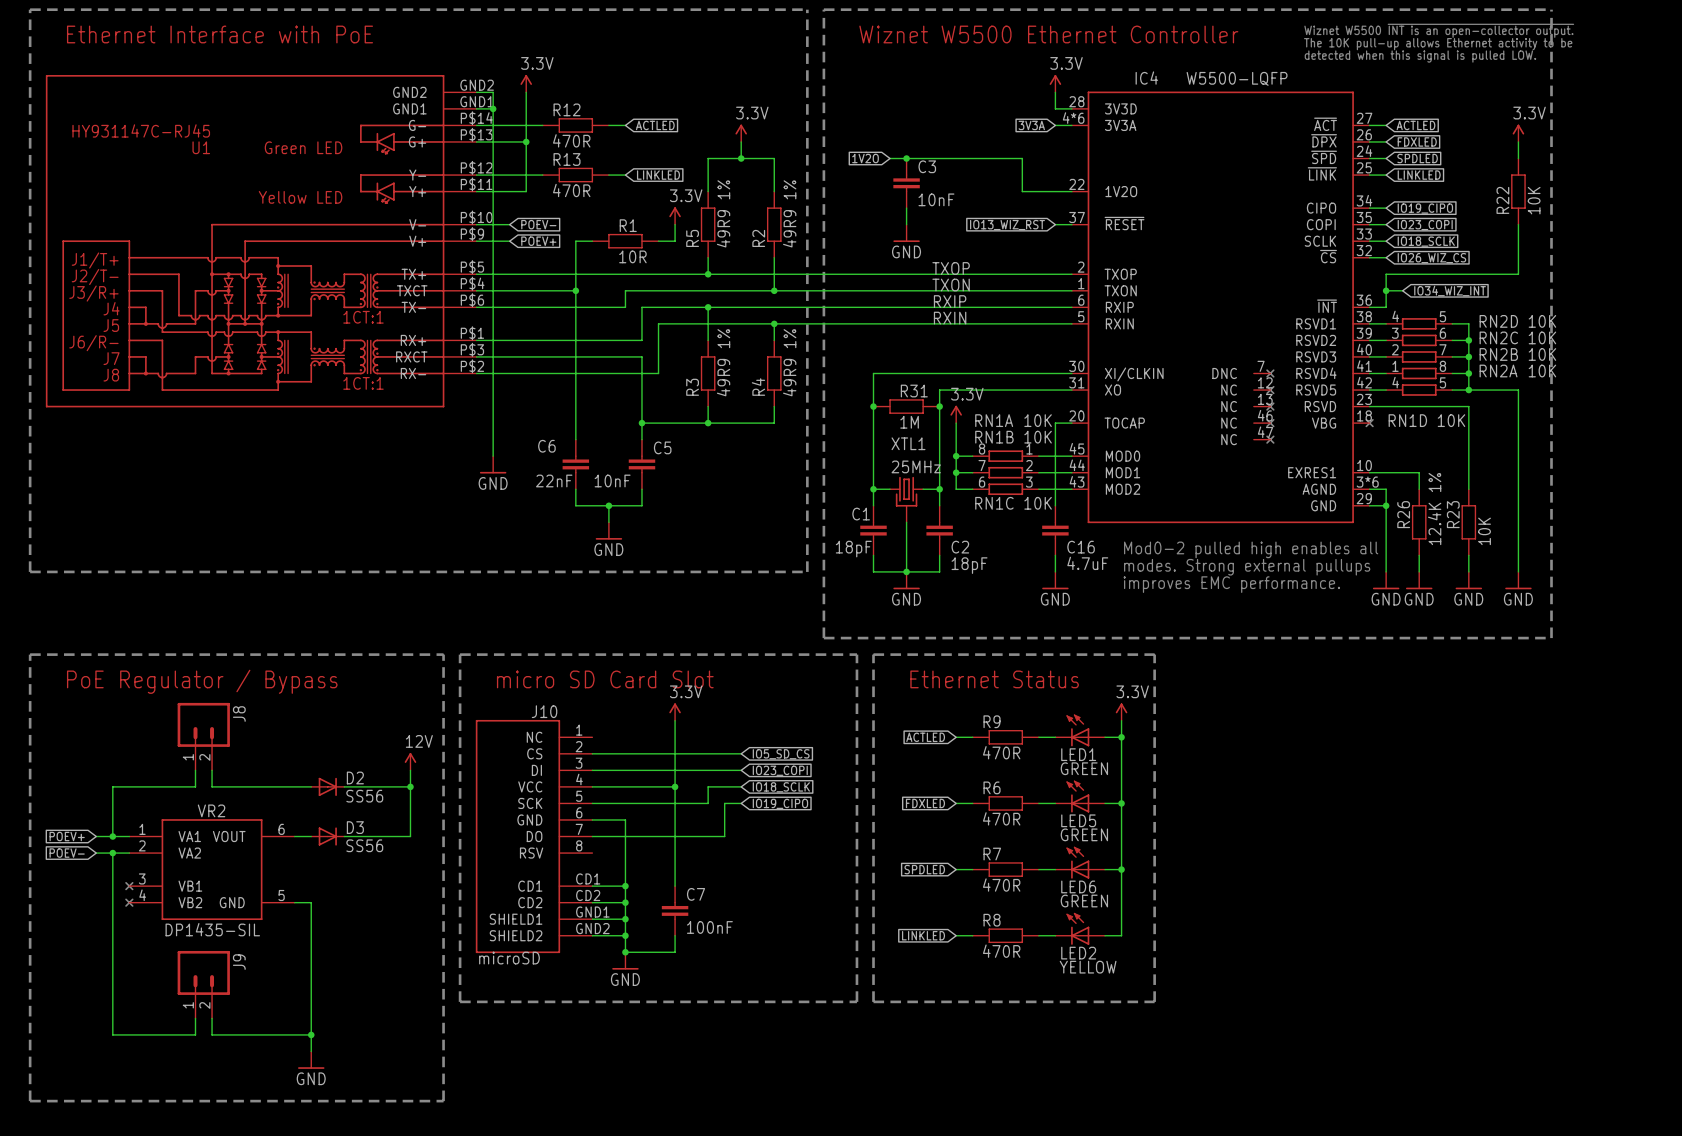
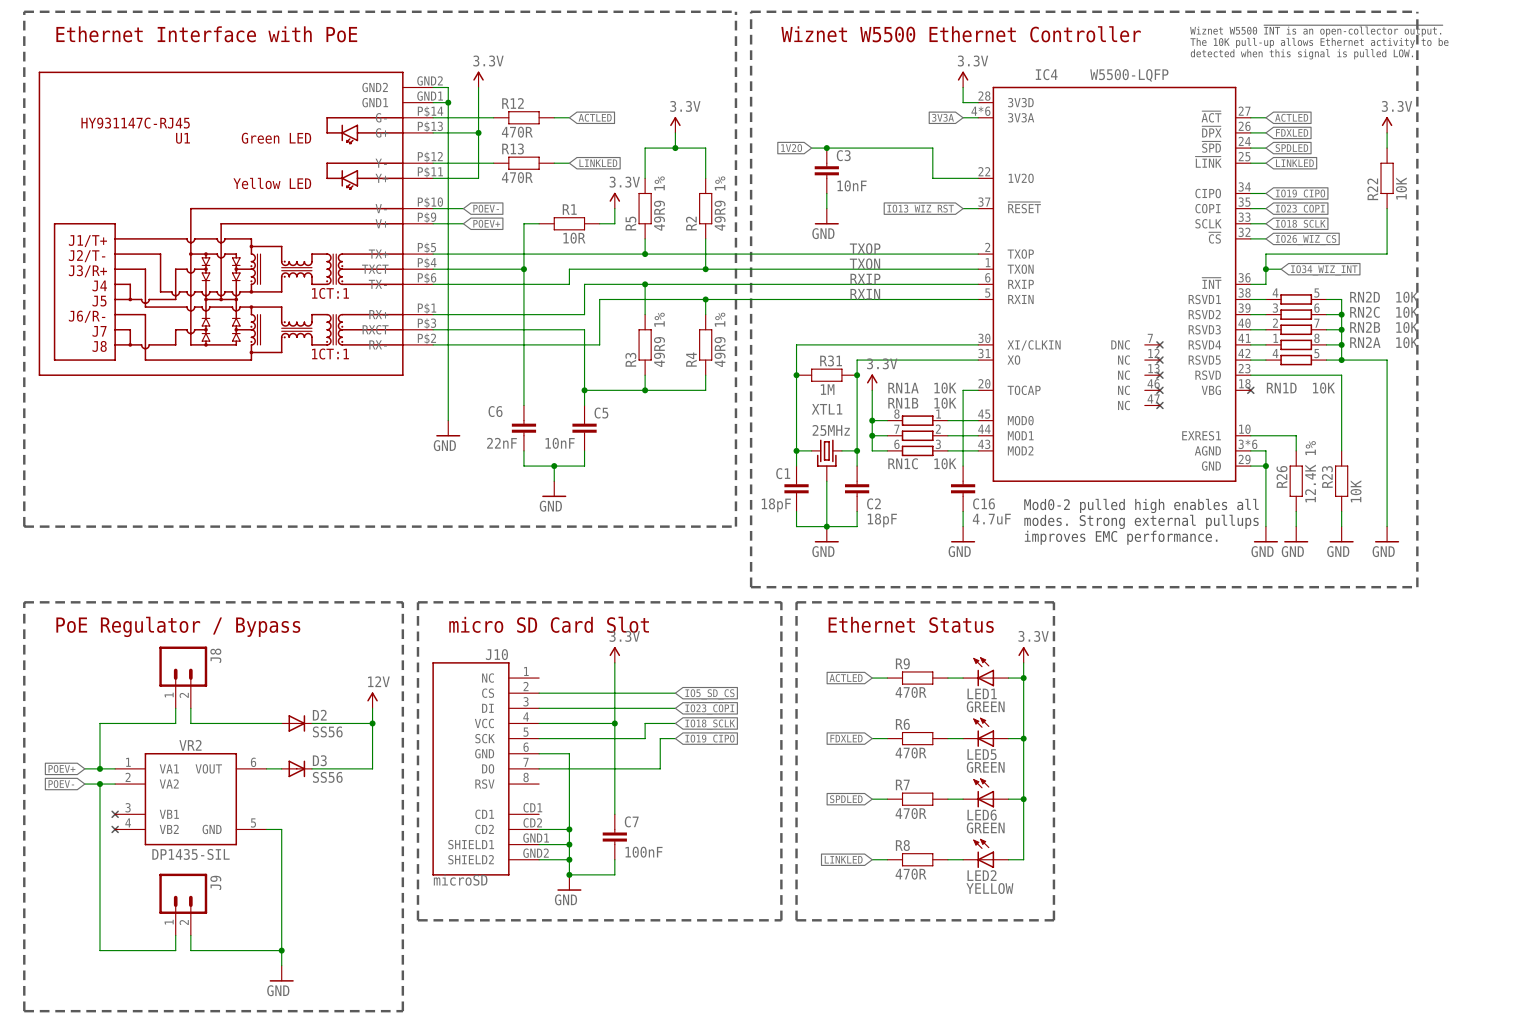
wire: (592, 886) (625, 886) -> none
junction: (625, 886) -> none

